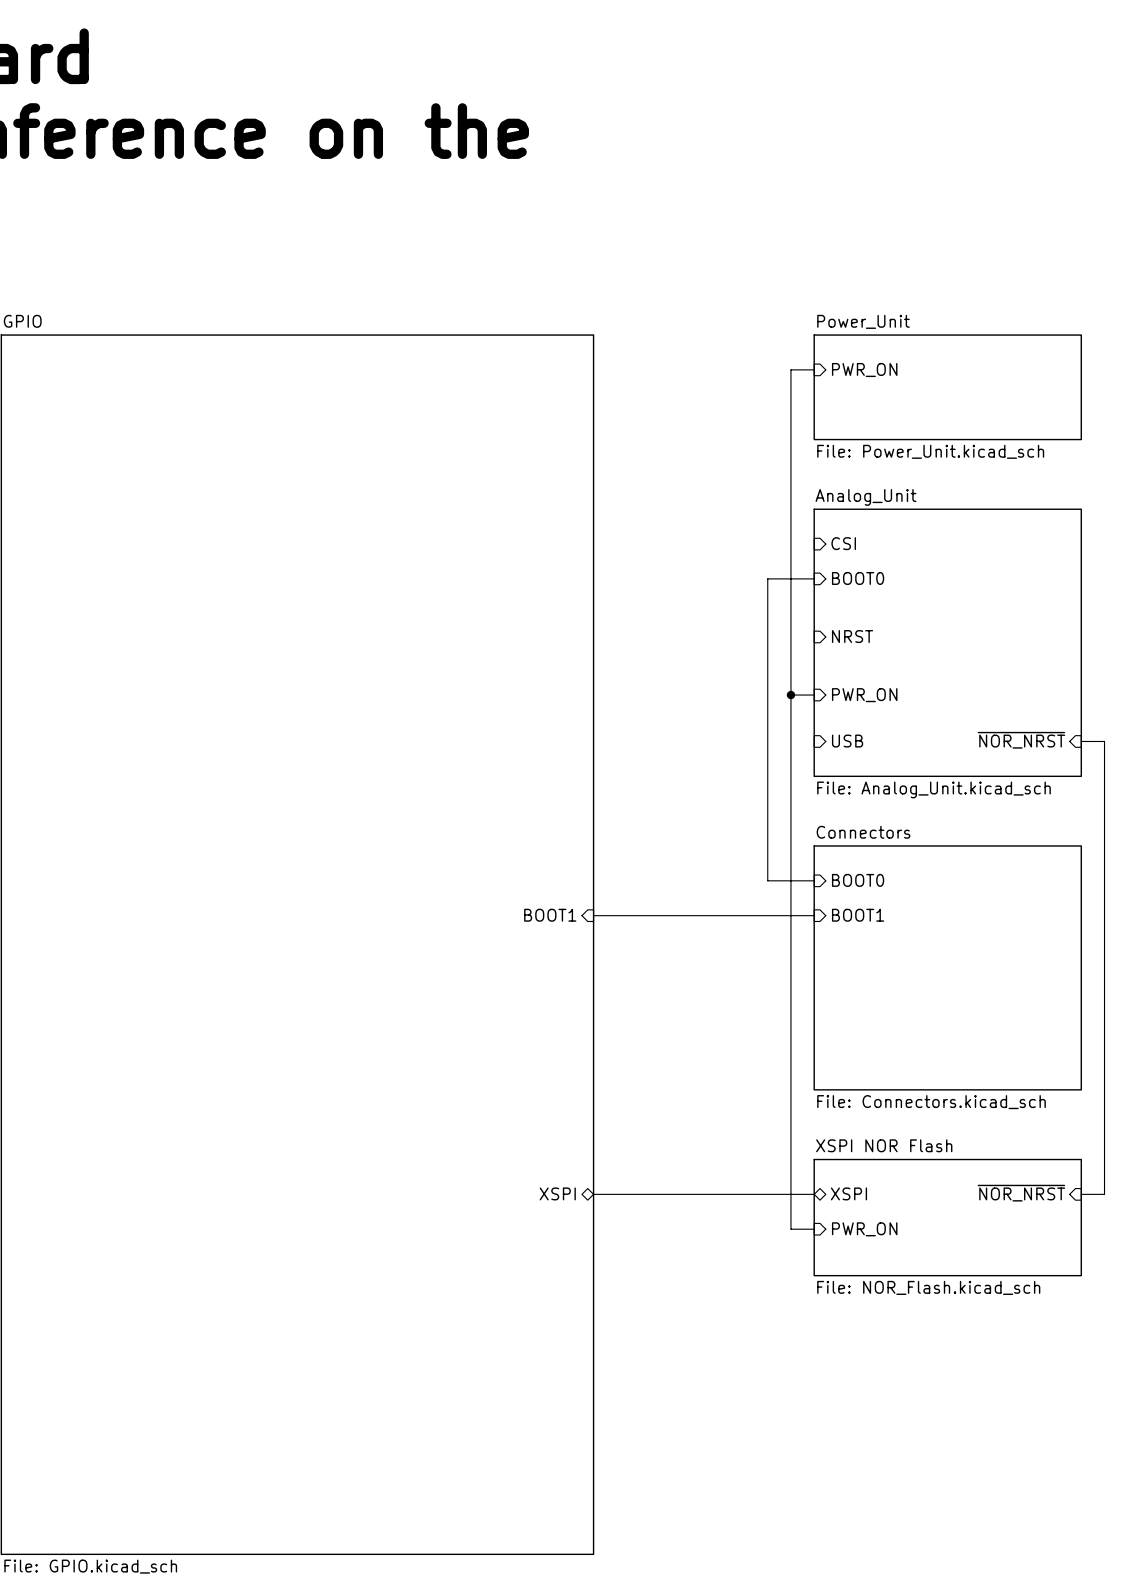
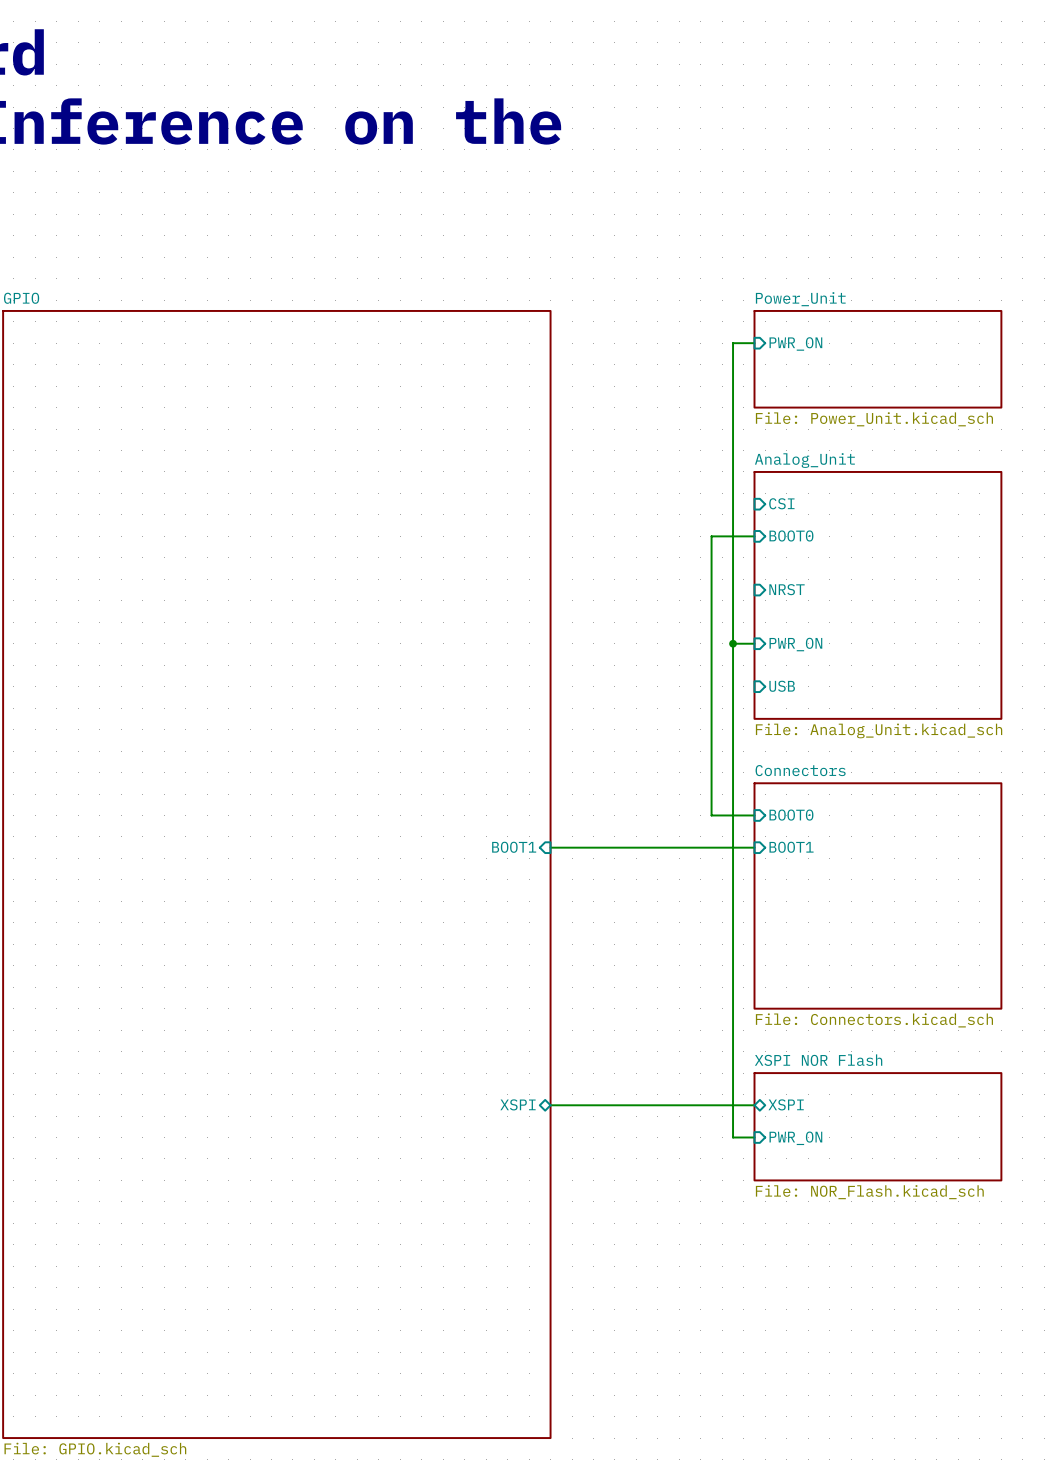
sheet pin: ~{NOR_NRST} (1021, 740) -> none
wire: (1081, 741) (1104, 741) (1104, 1194) (1081, 1194) -> none
sheet pin: ~{NOR_NRST} (1021, 1193) -> none

